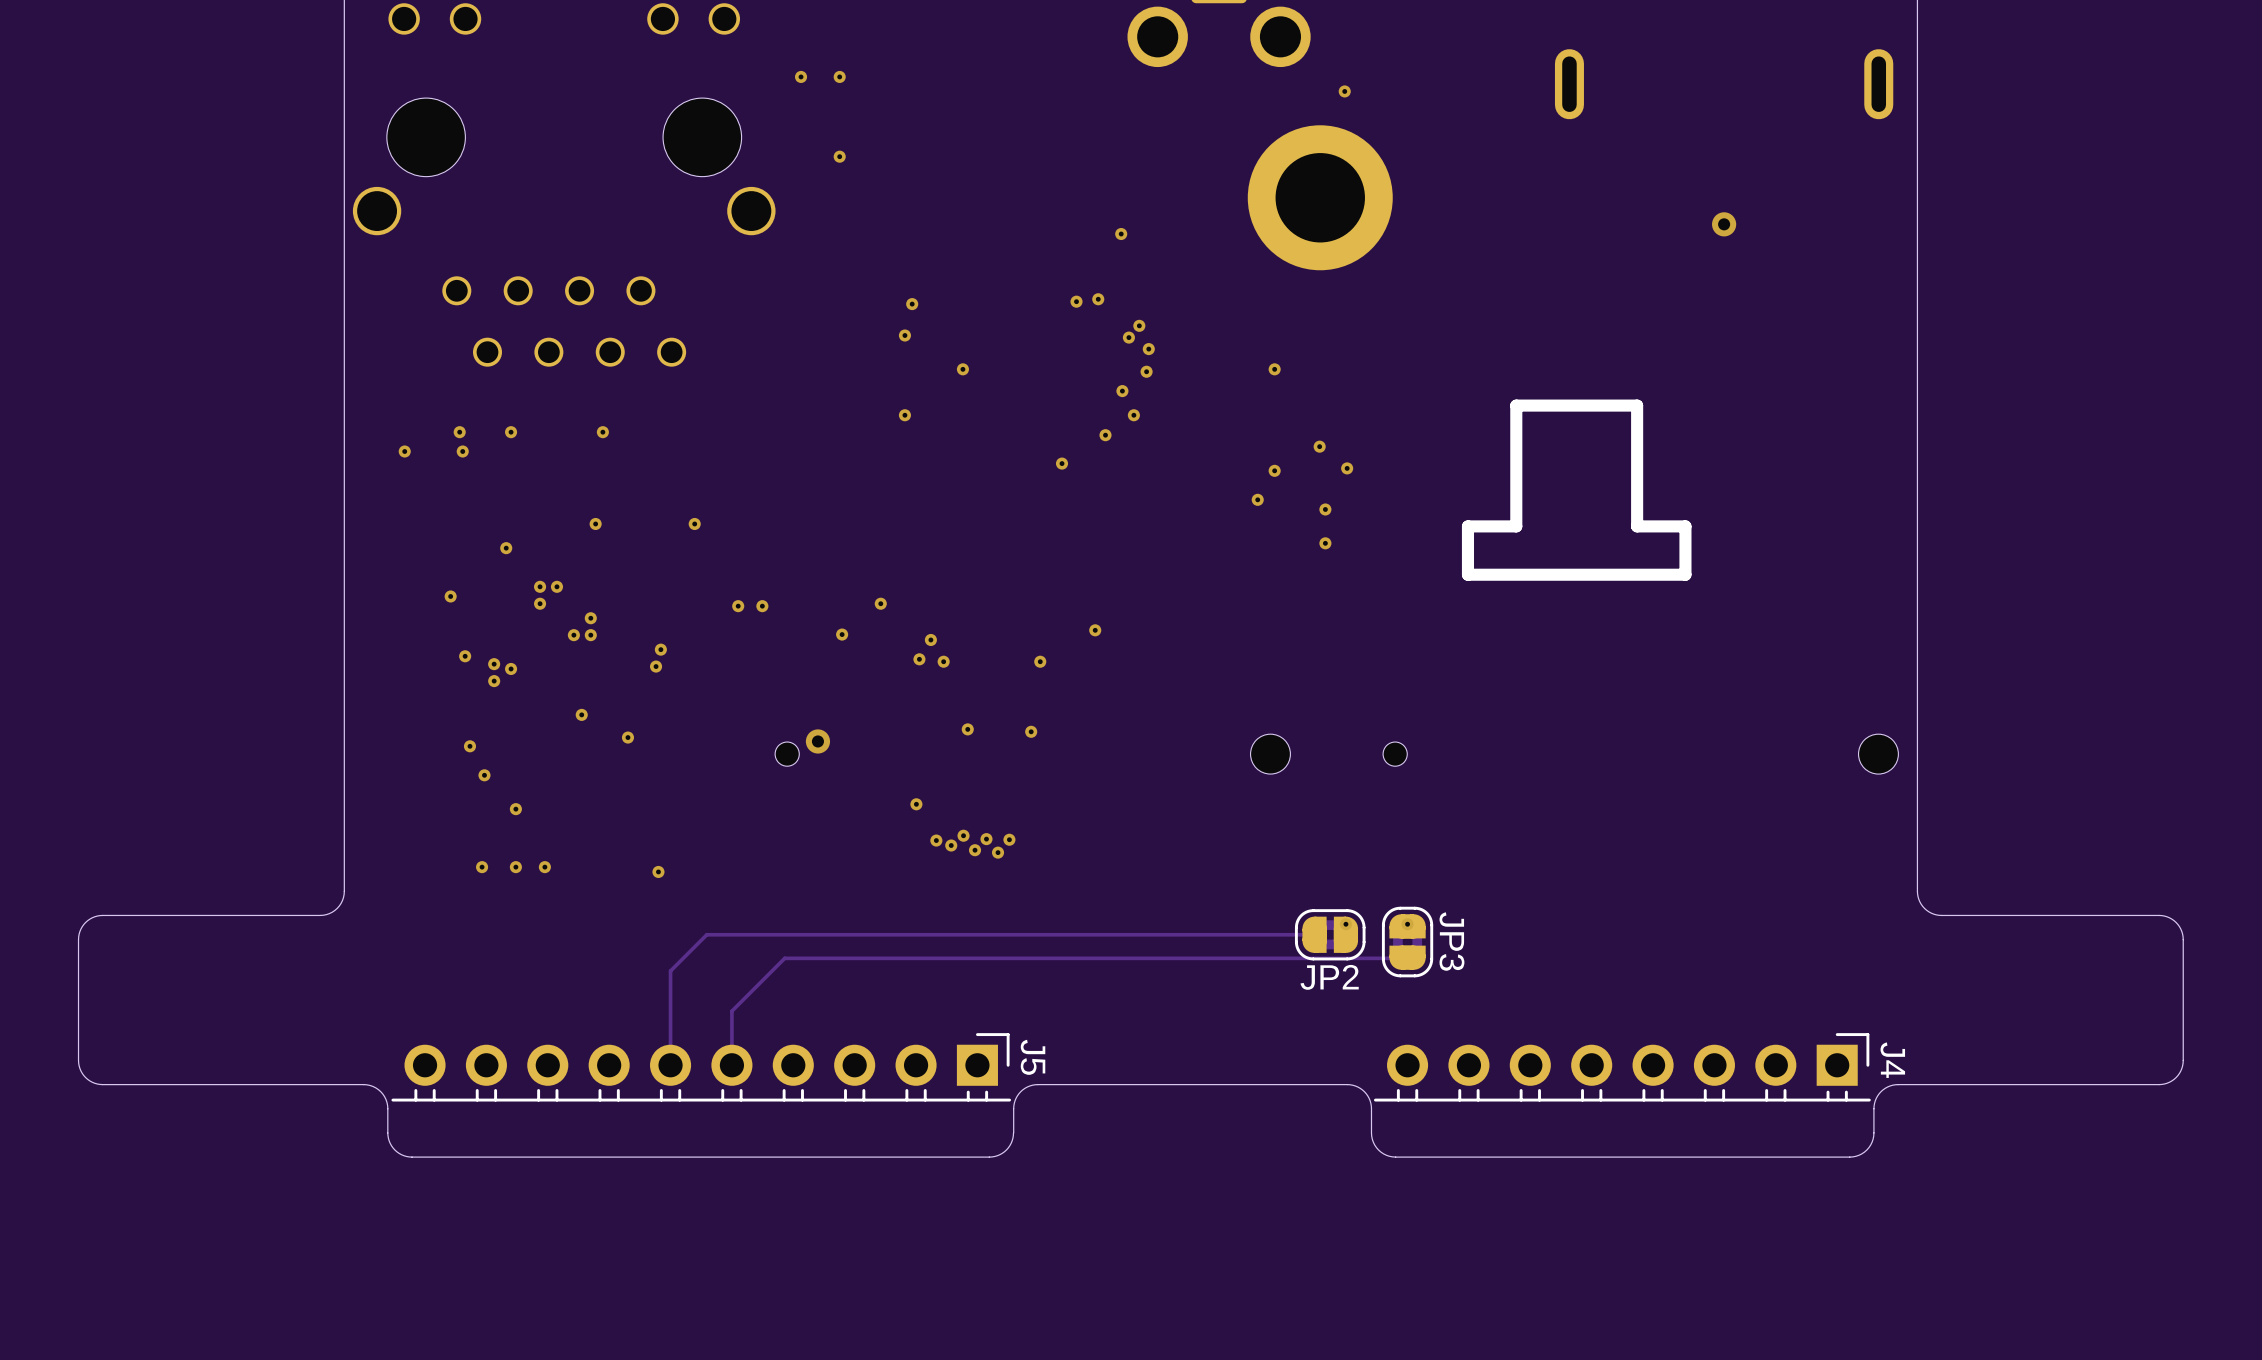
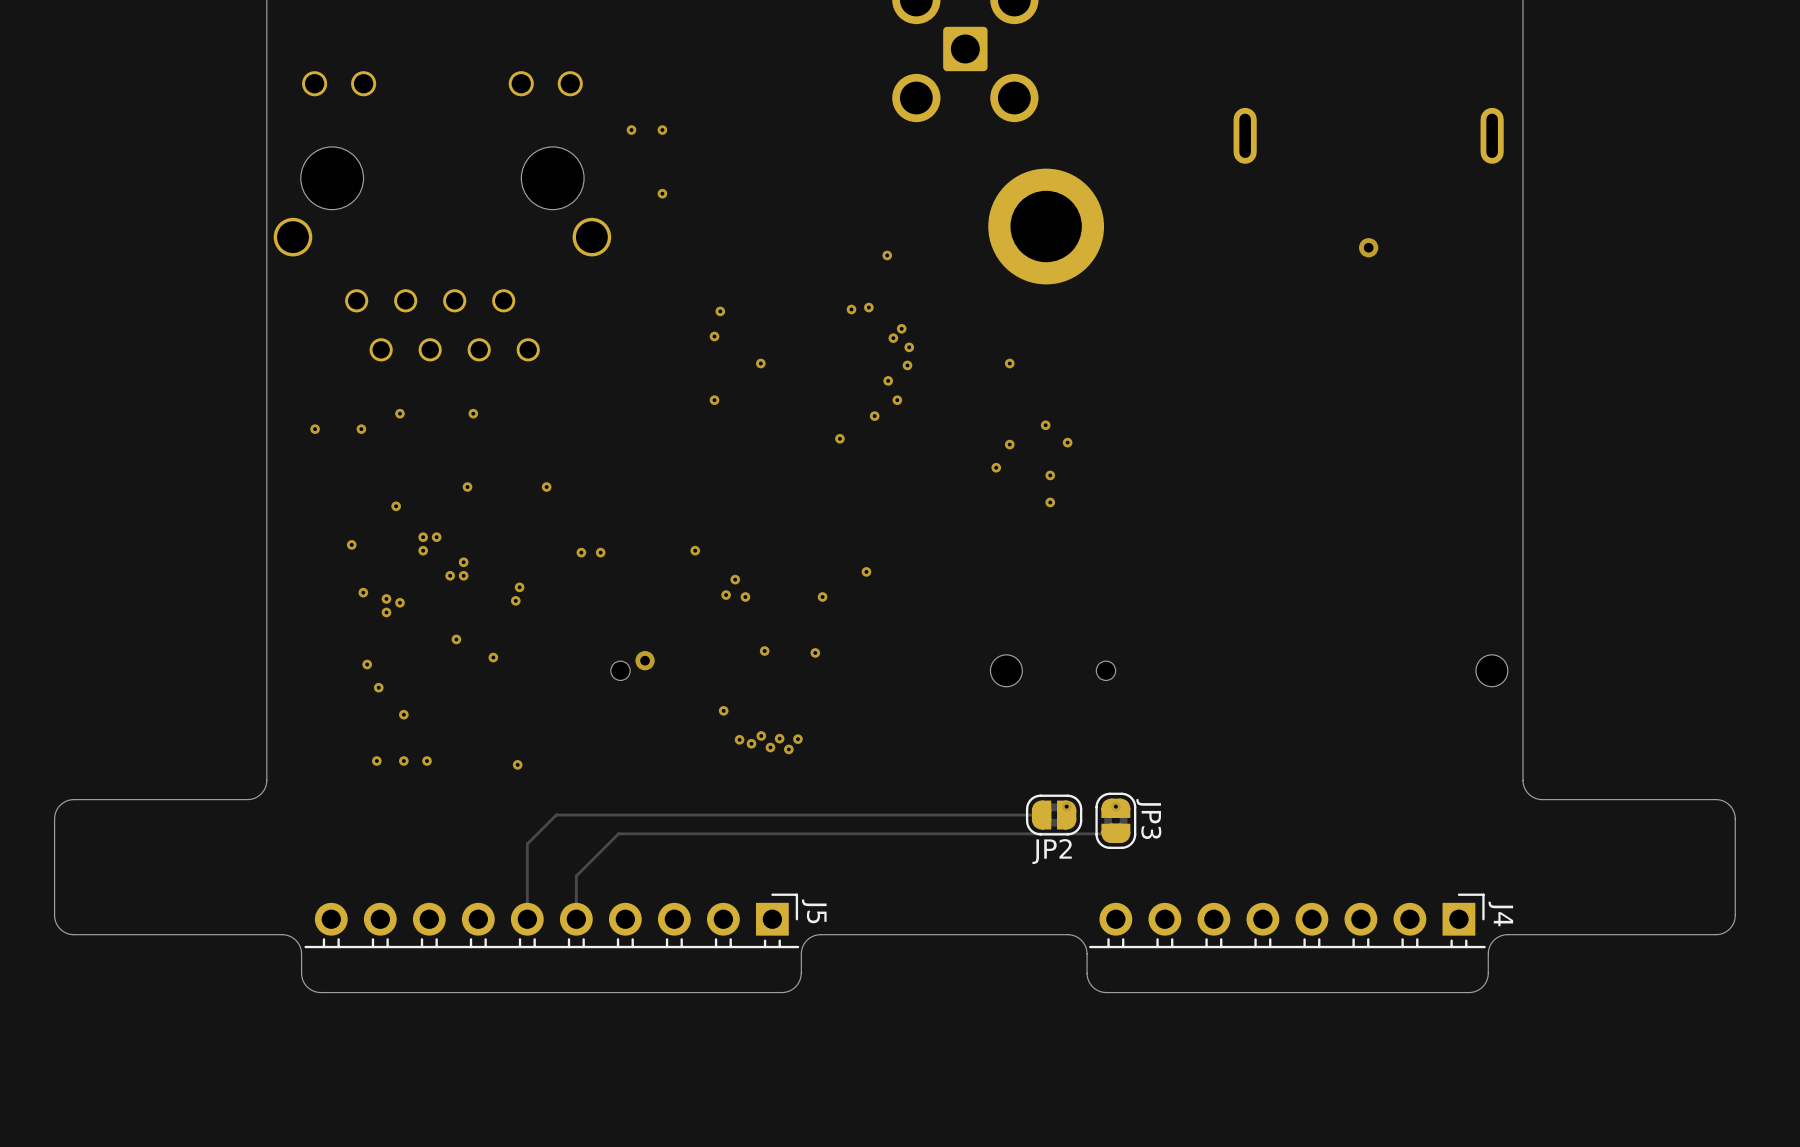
via: (1344, 91) -> none
line: (1637, 405) (1516, 405) (1516, 526) (1467, 526) (1467, 574) (1685, 574) (1685, 526) (1637, 526) (1637, 405) -> none
via: (459, 432) -> none
via: (842, 634) -> none

